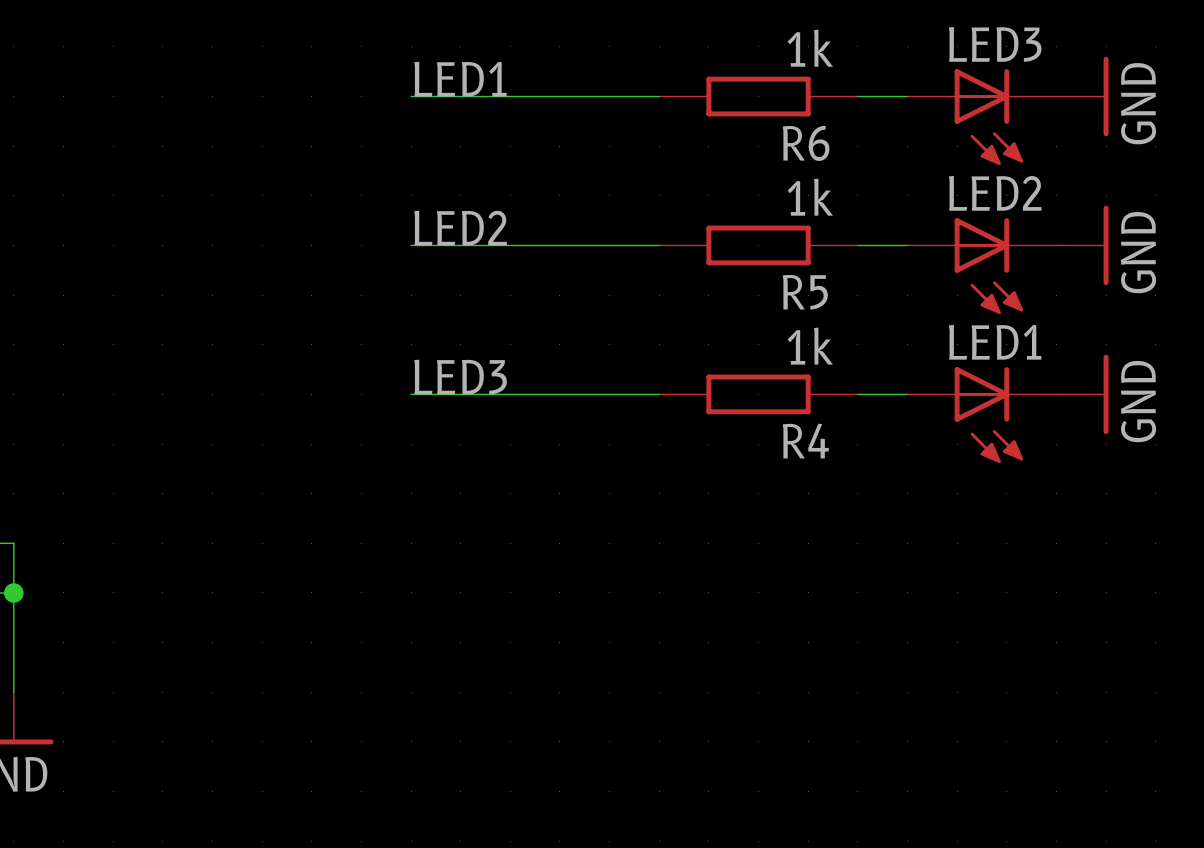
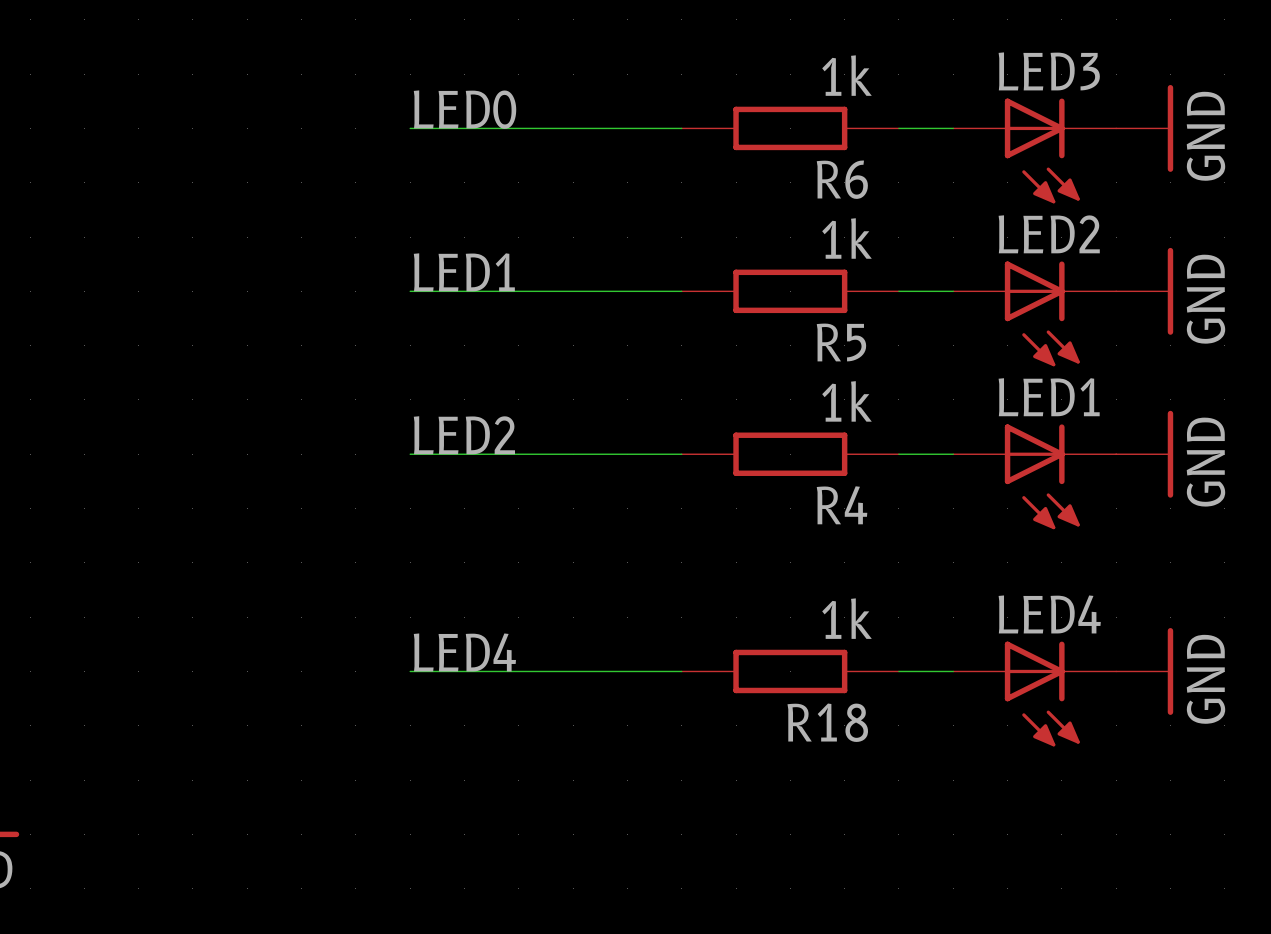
label: LED1 (460, 79) -> LED0 (465, 109)
label: LED2 (460, 228) -> LED1 (464, 272)
label: LED3 (460, 377) -> LED2 (464, 435)
label: none -> LED4 (464, 652)
wire: none -> (410, 671) (681, 671)
R18: none -> 1k (790, 671)
wire: none -> (898, 671) (953, 671)
power symbol: none -> GND (1144, 671)
LED4: none -> (1034, 694)

